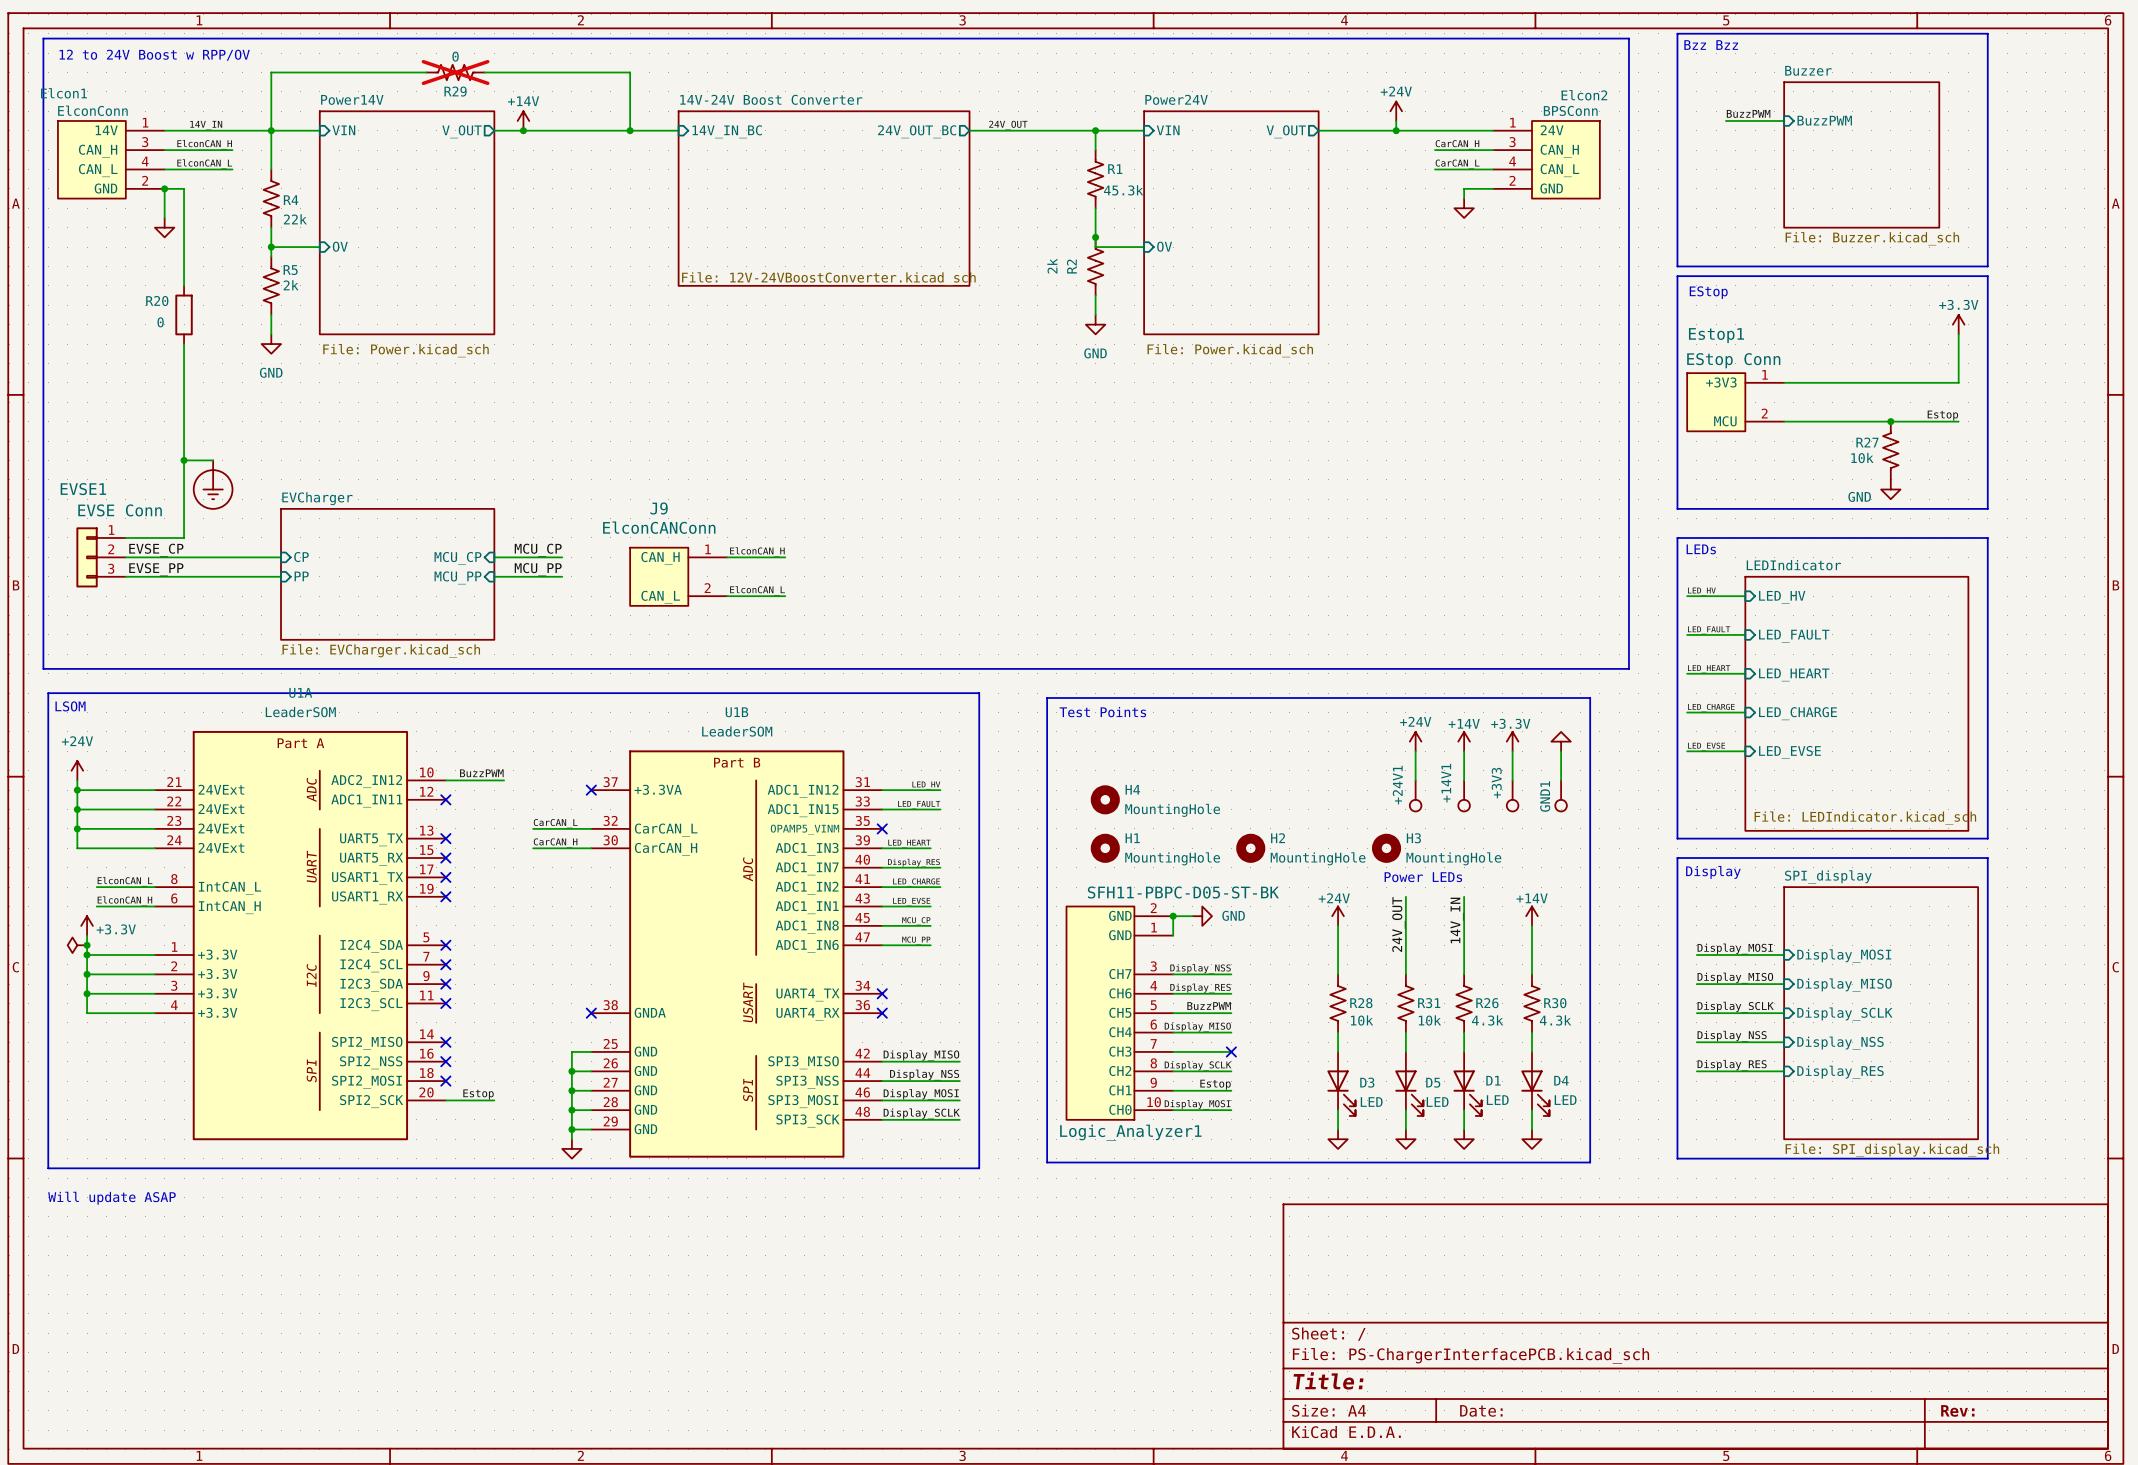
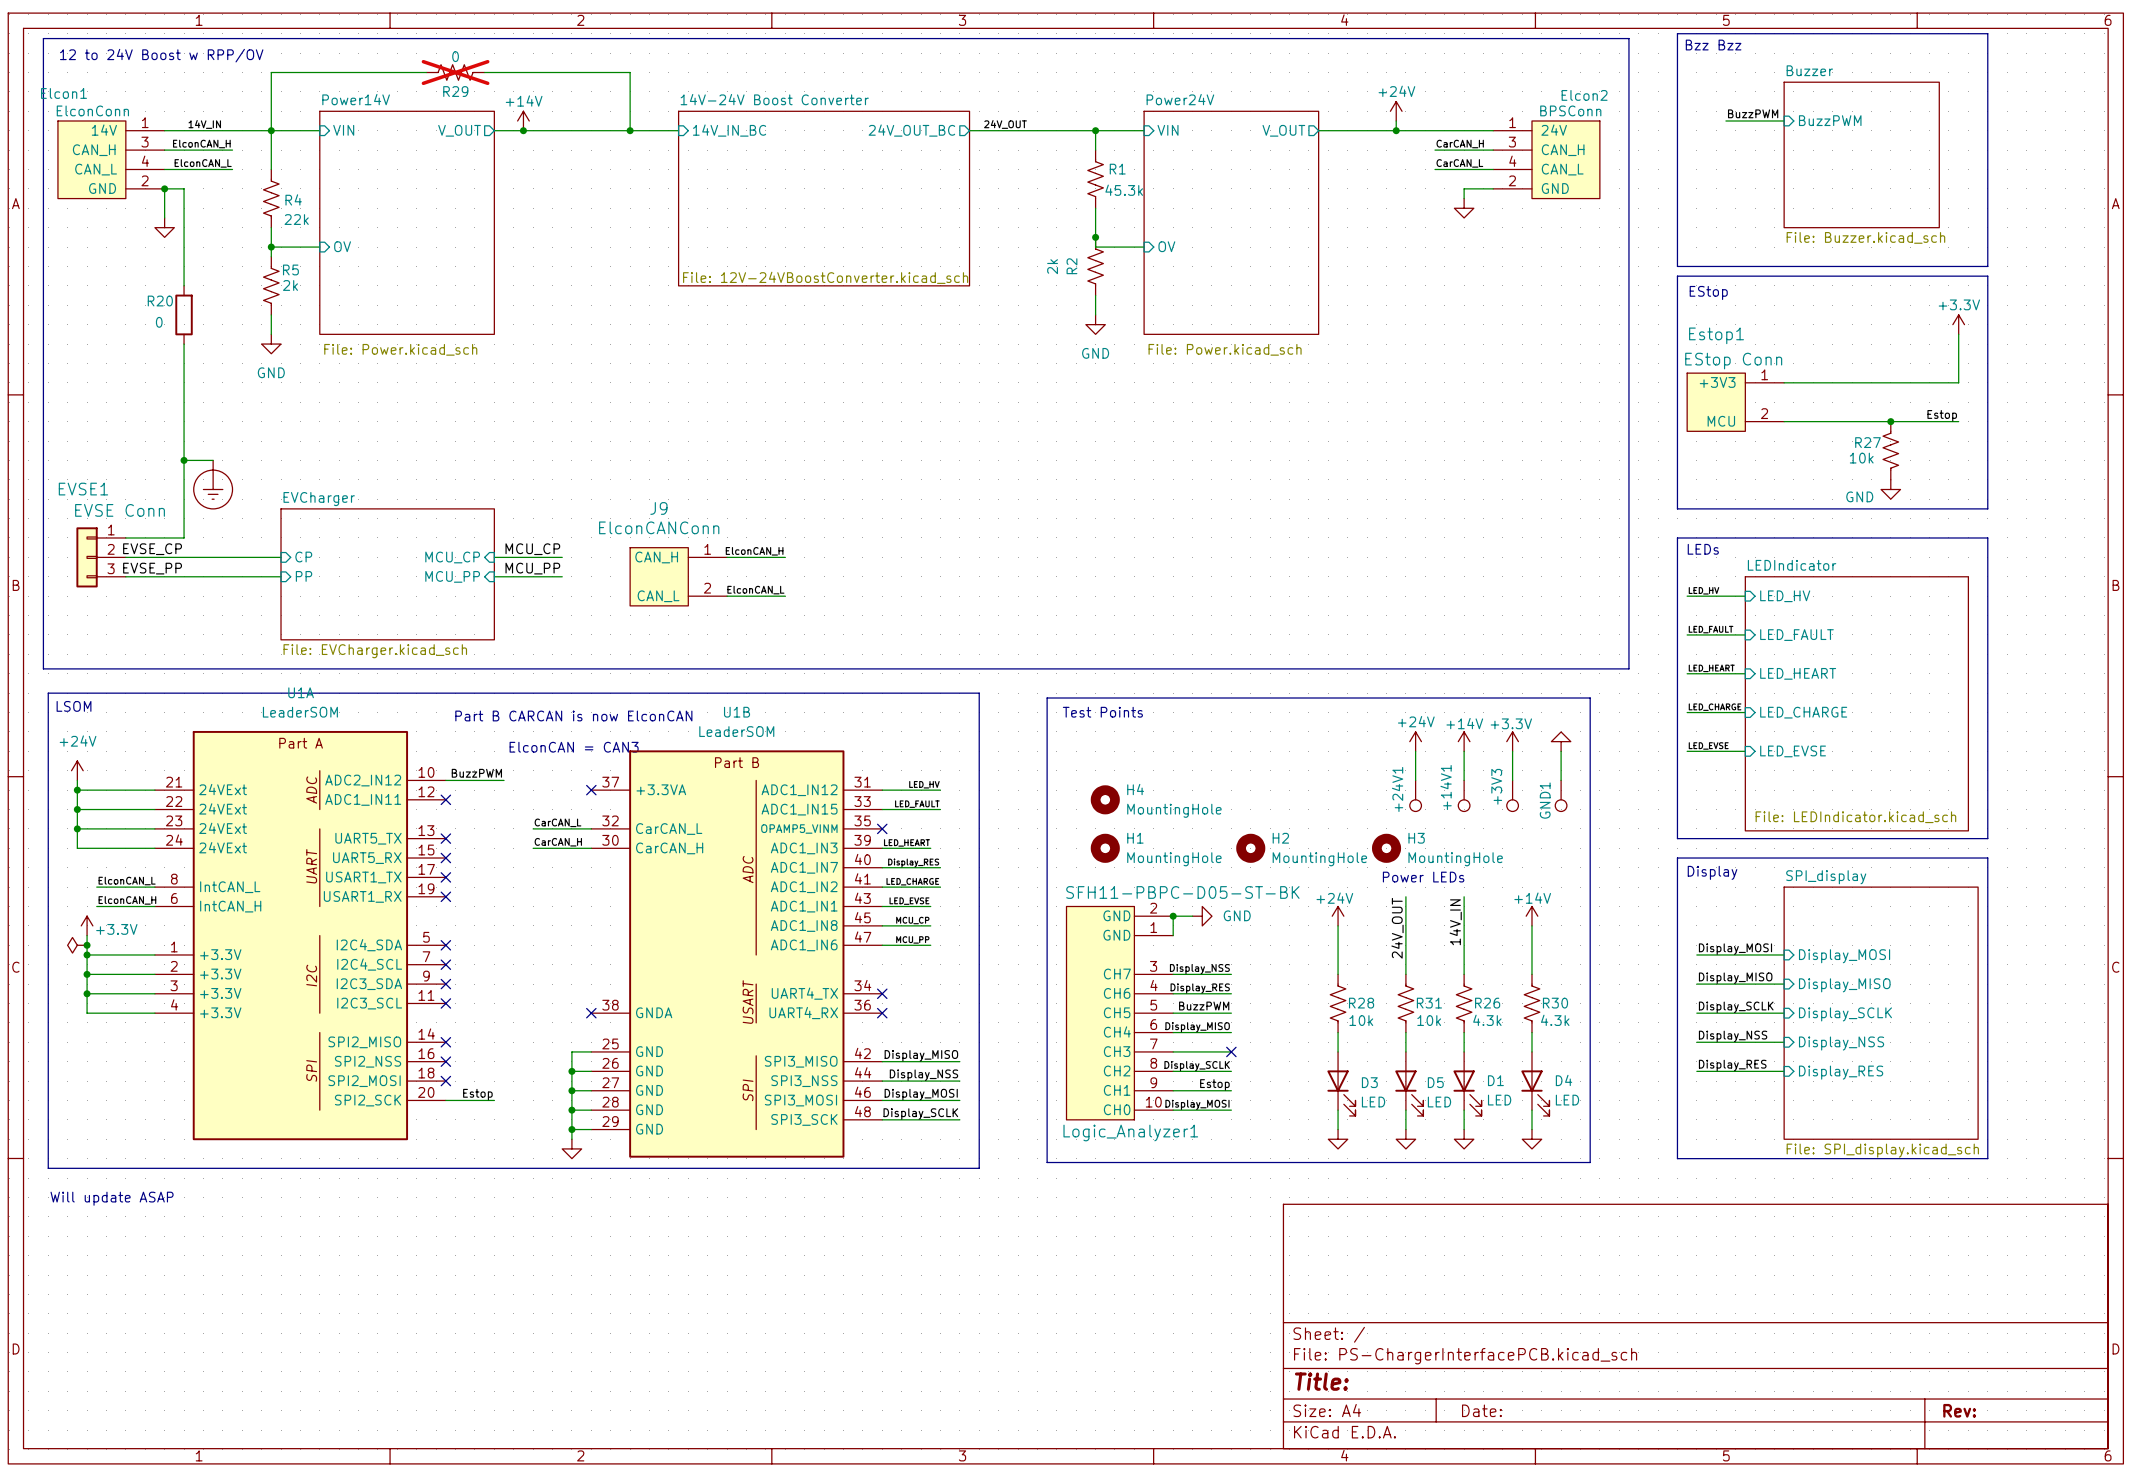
text: none -> Part B CARCAN is now ElconCAN (573, 715)
text: none -> ElconCAN = CAN3 (574, 747)

